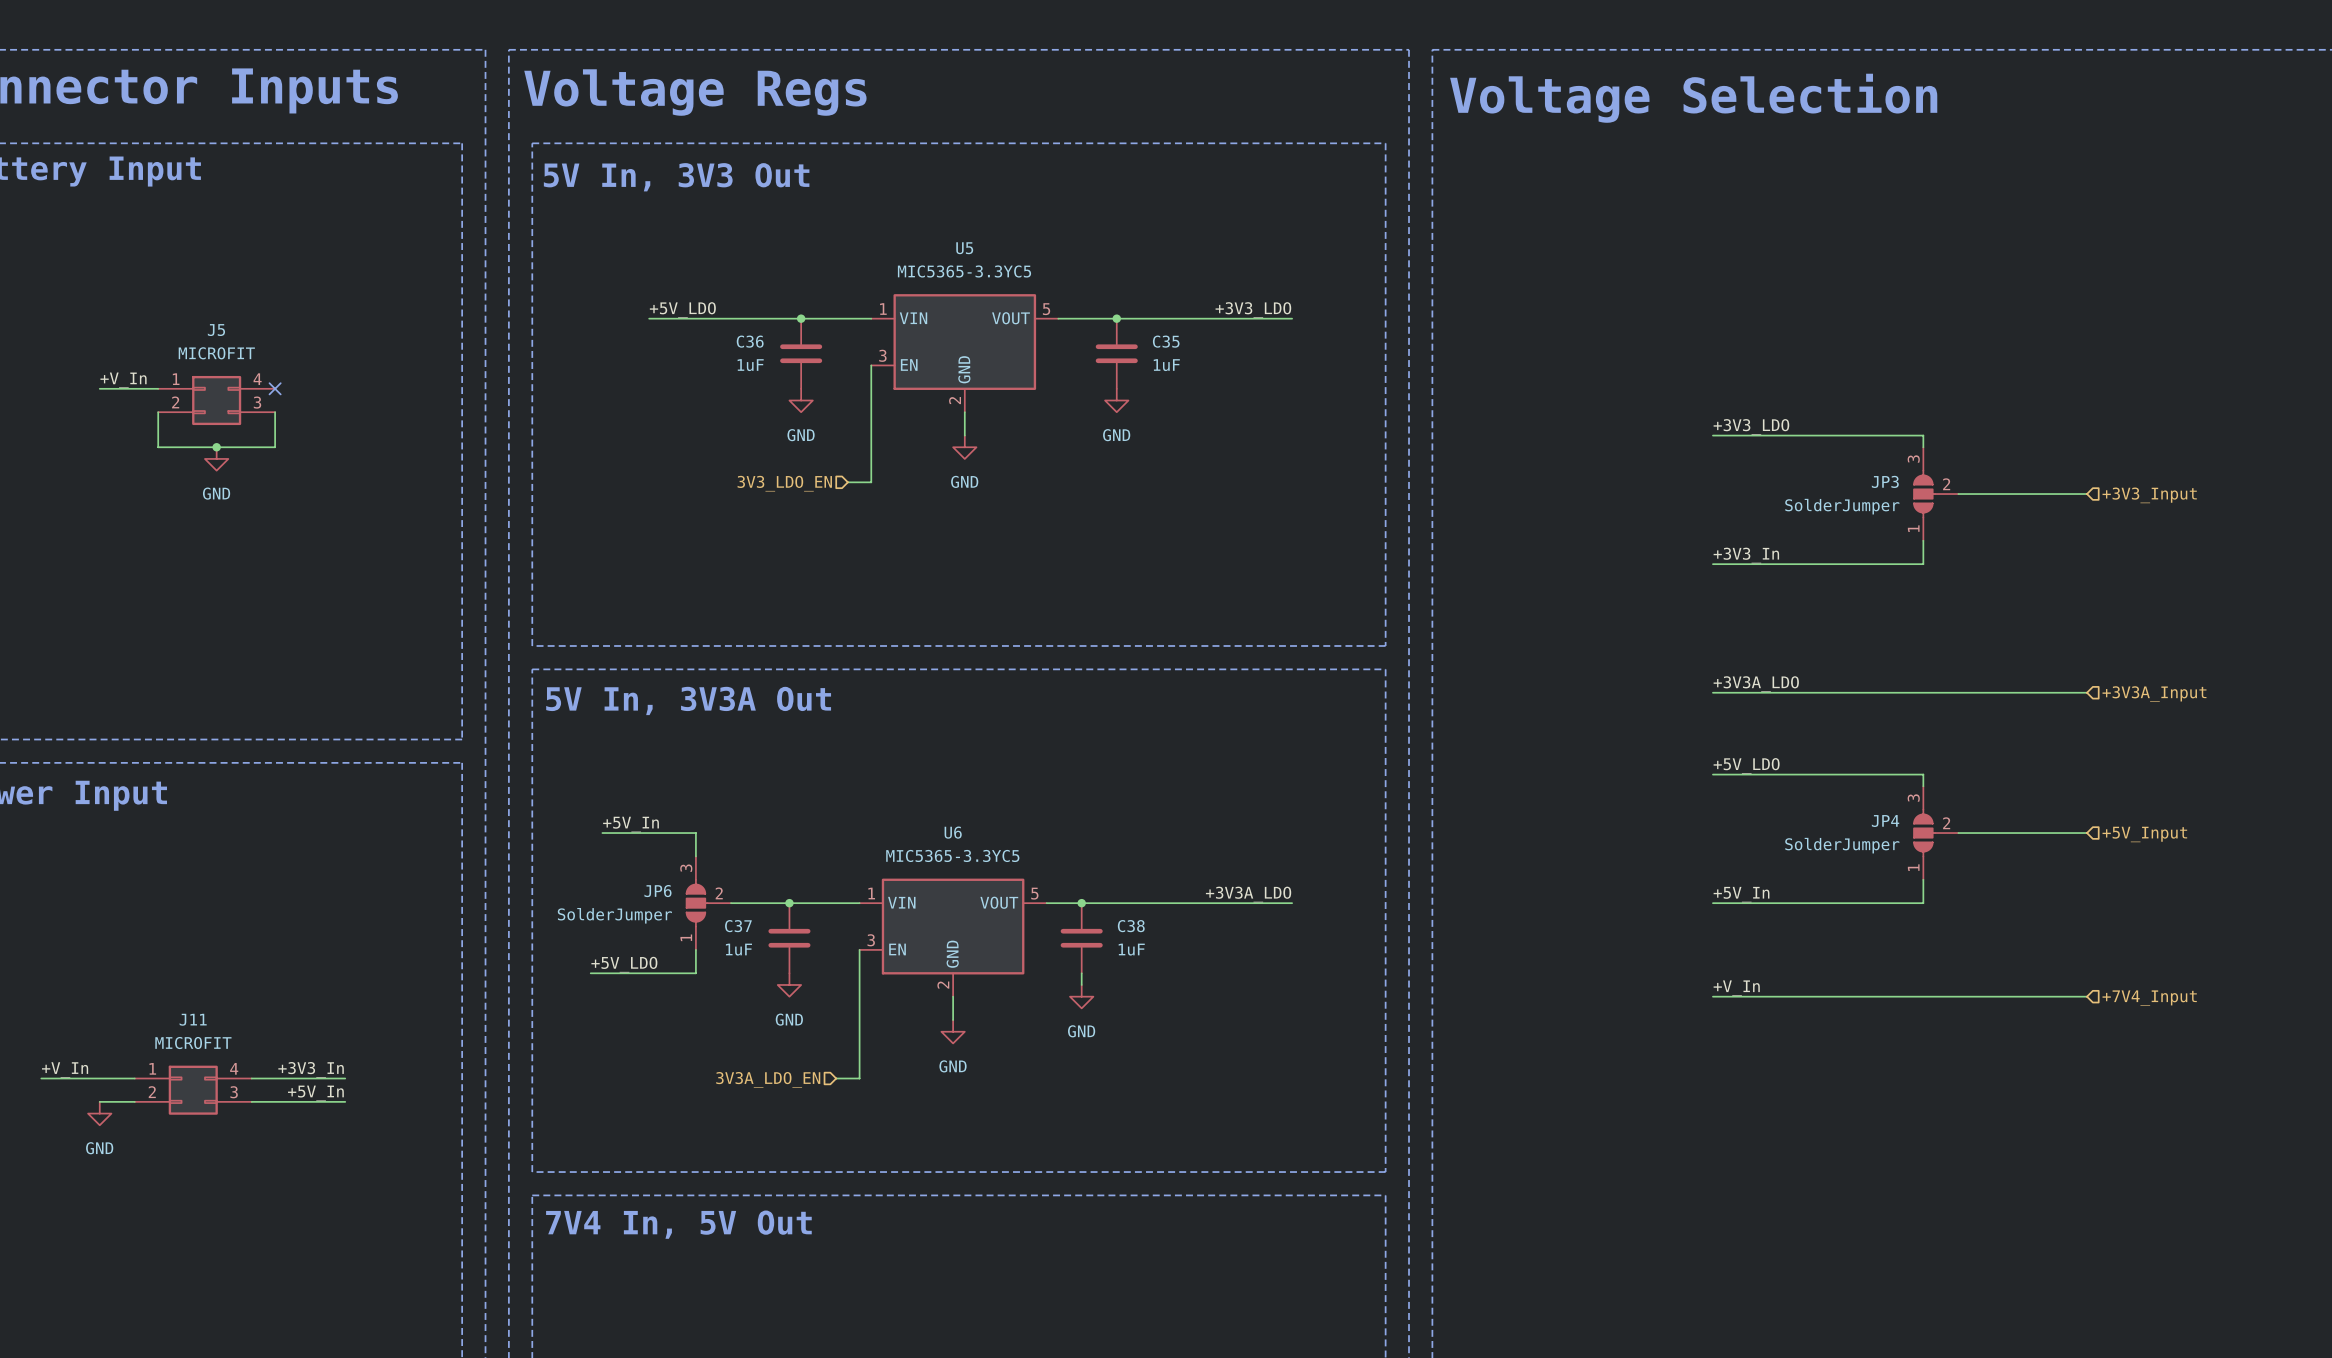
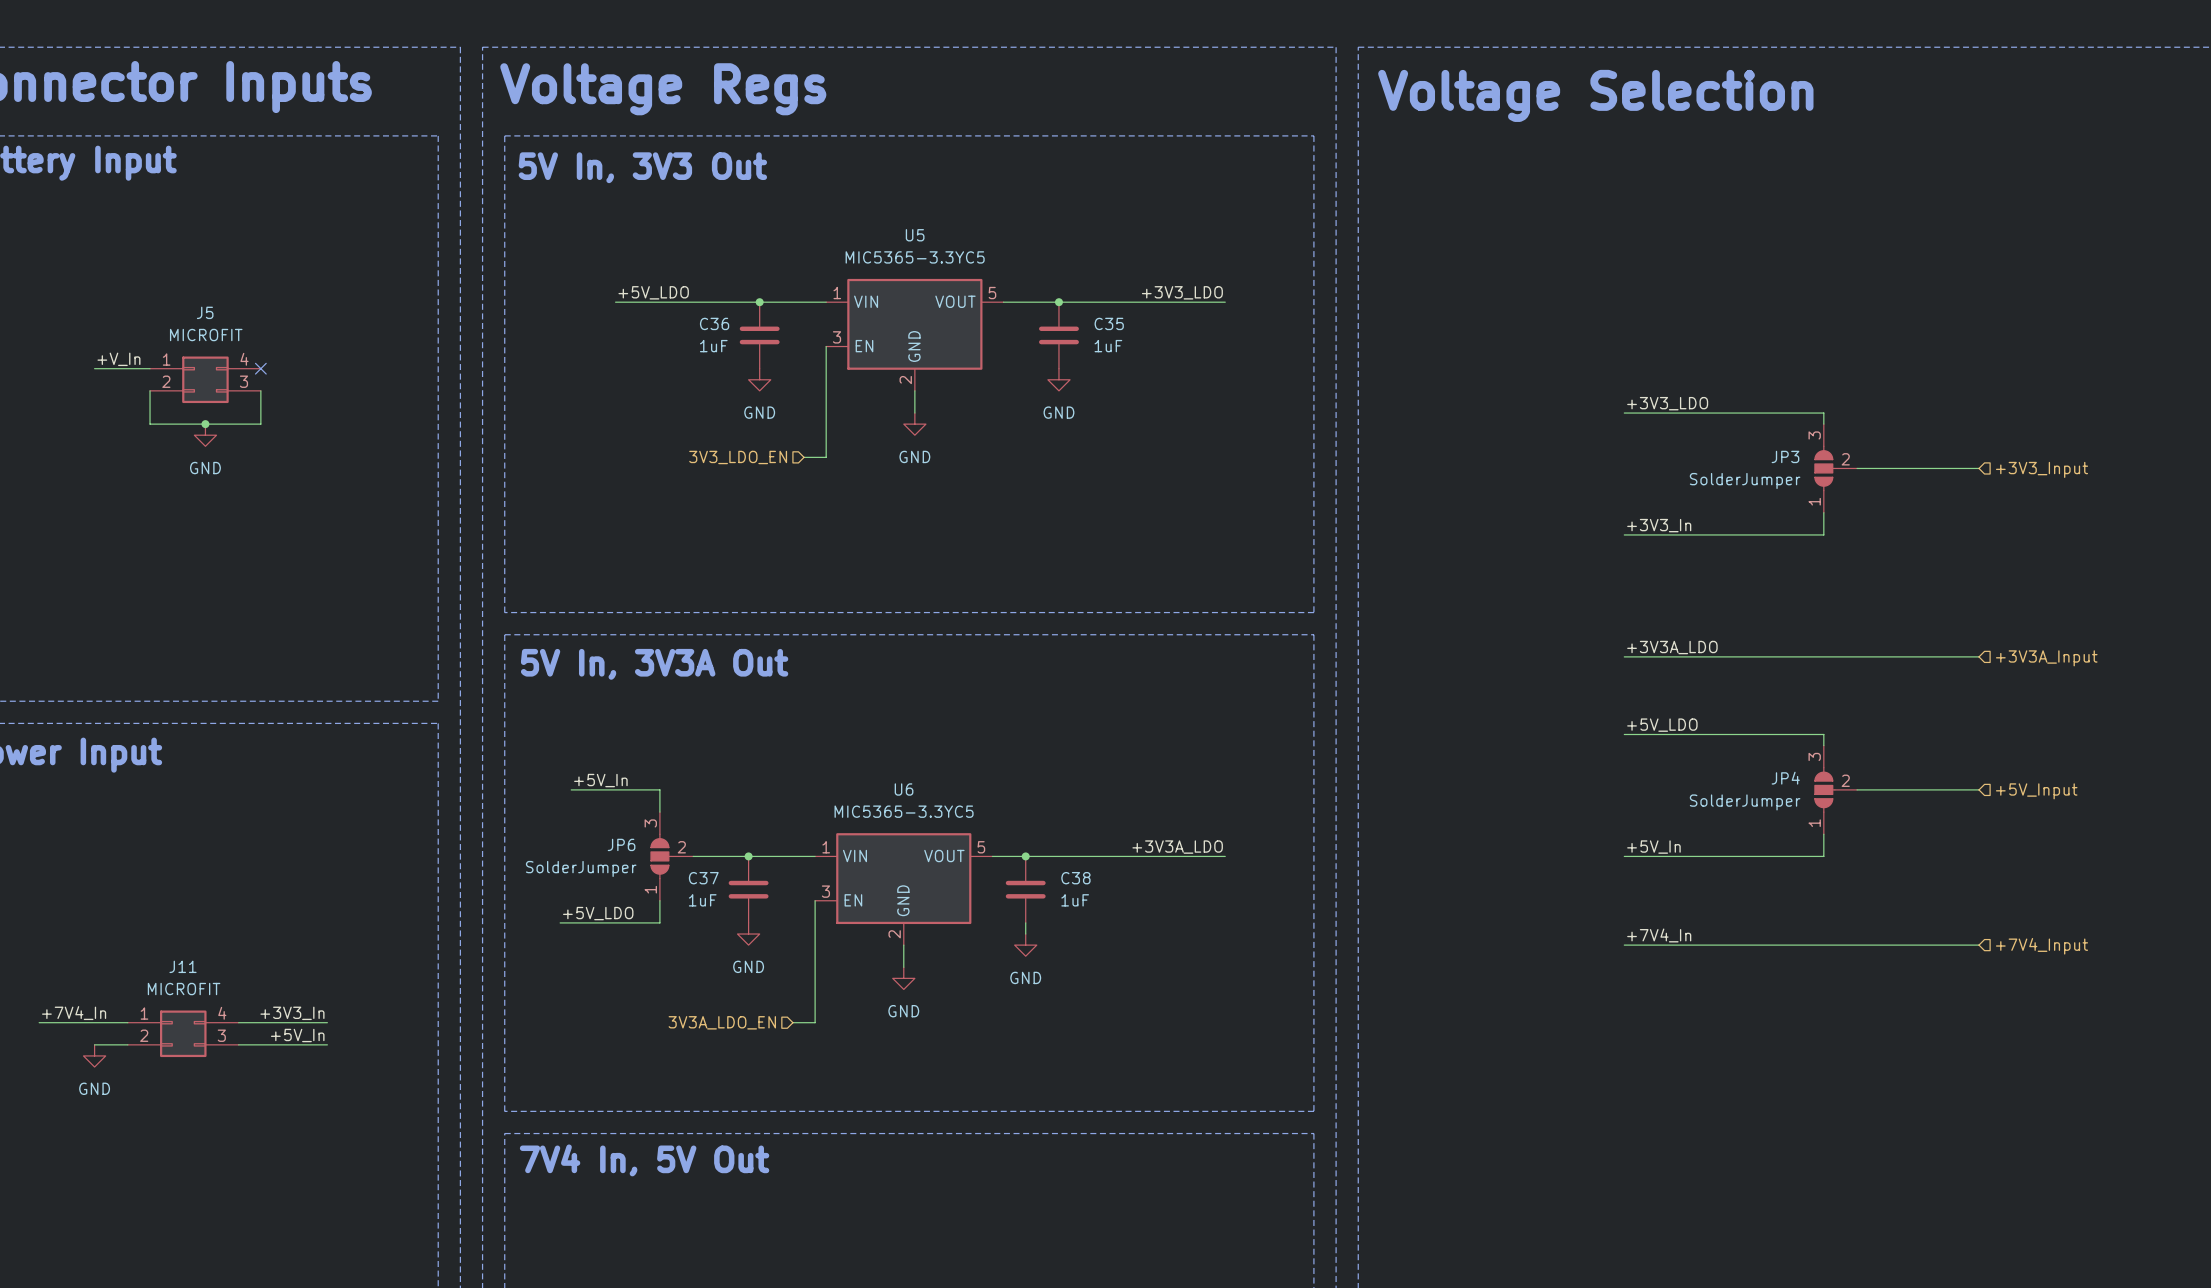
label: +V_In (1736, 988) -> +7V4_In (1659, 935)
label: +V_In (65, 1069) -> +7V4_In (74, 1013)

